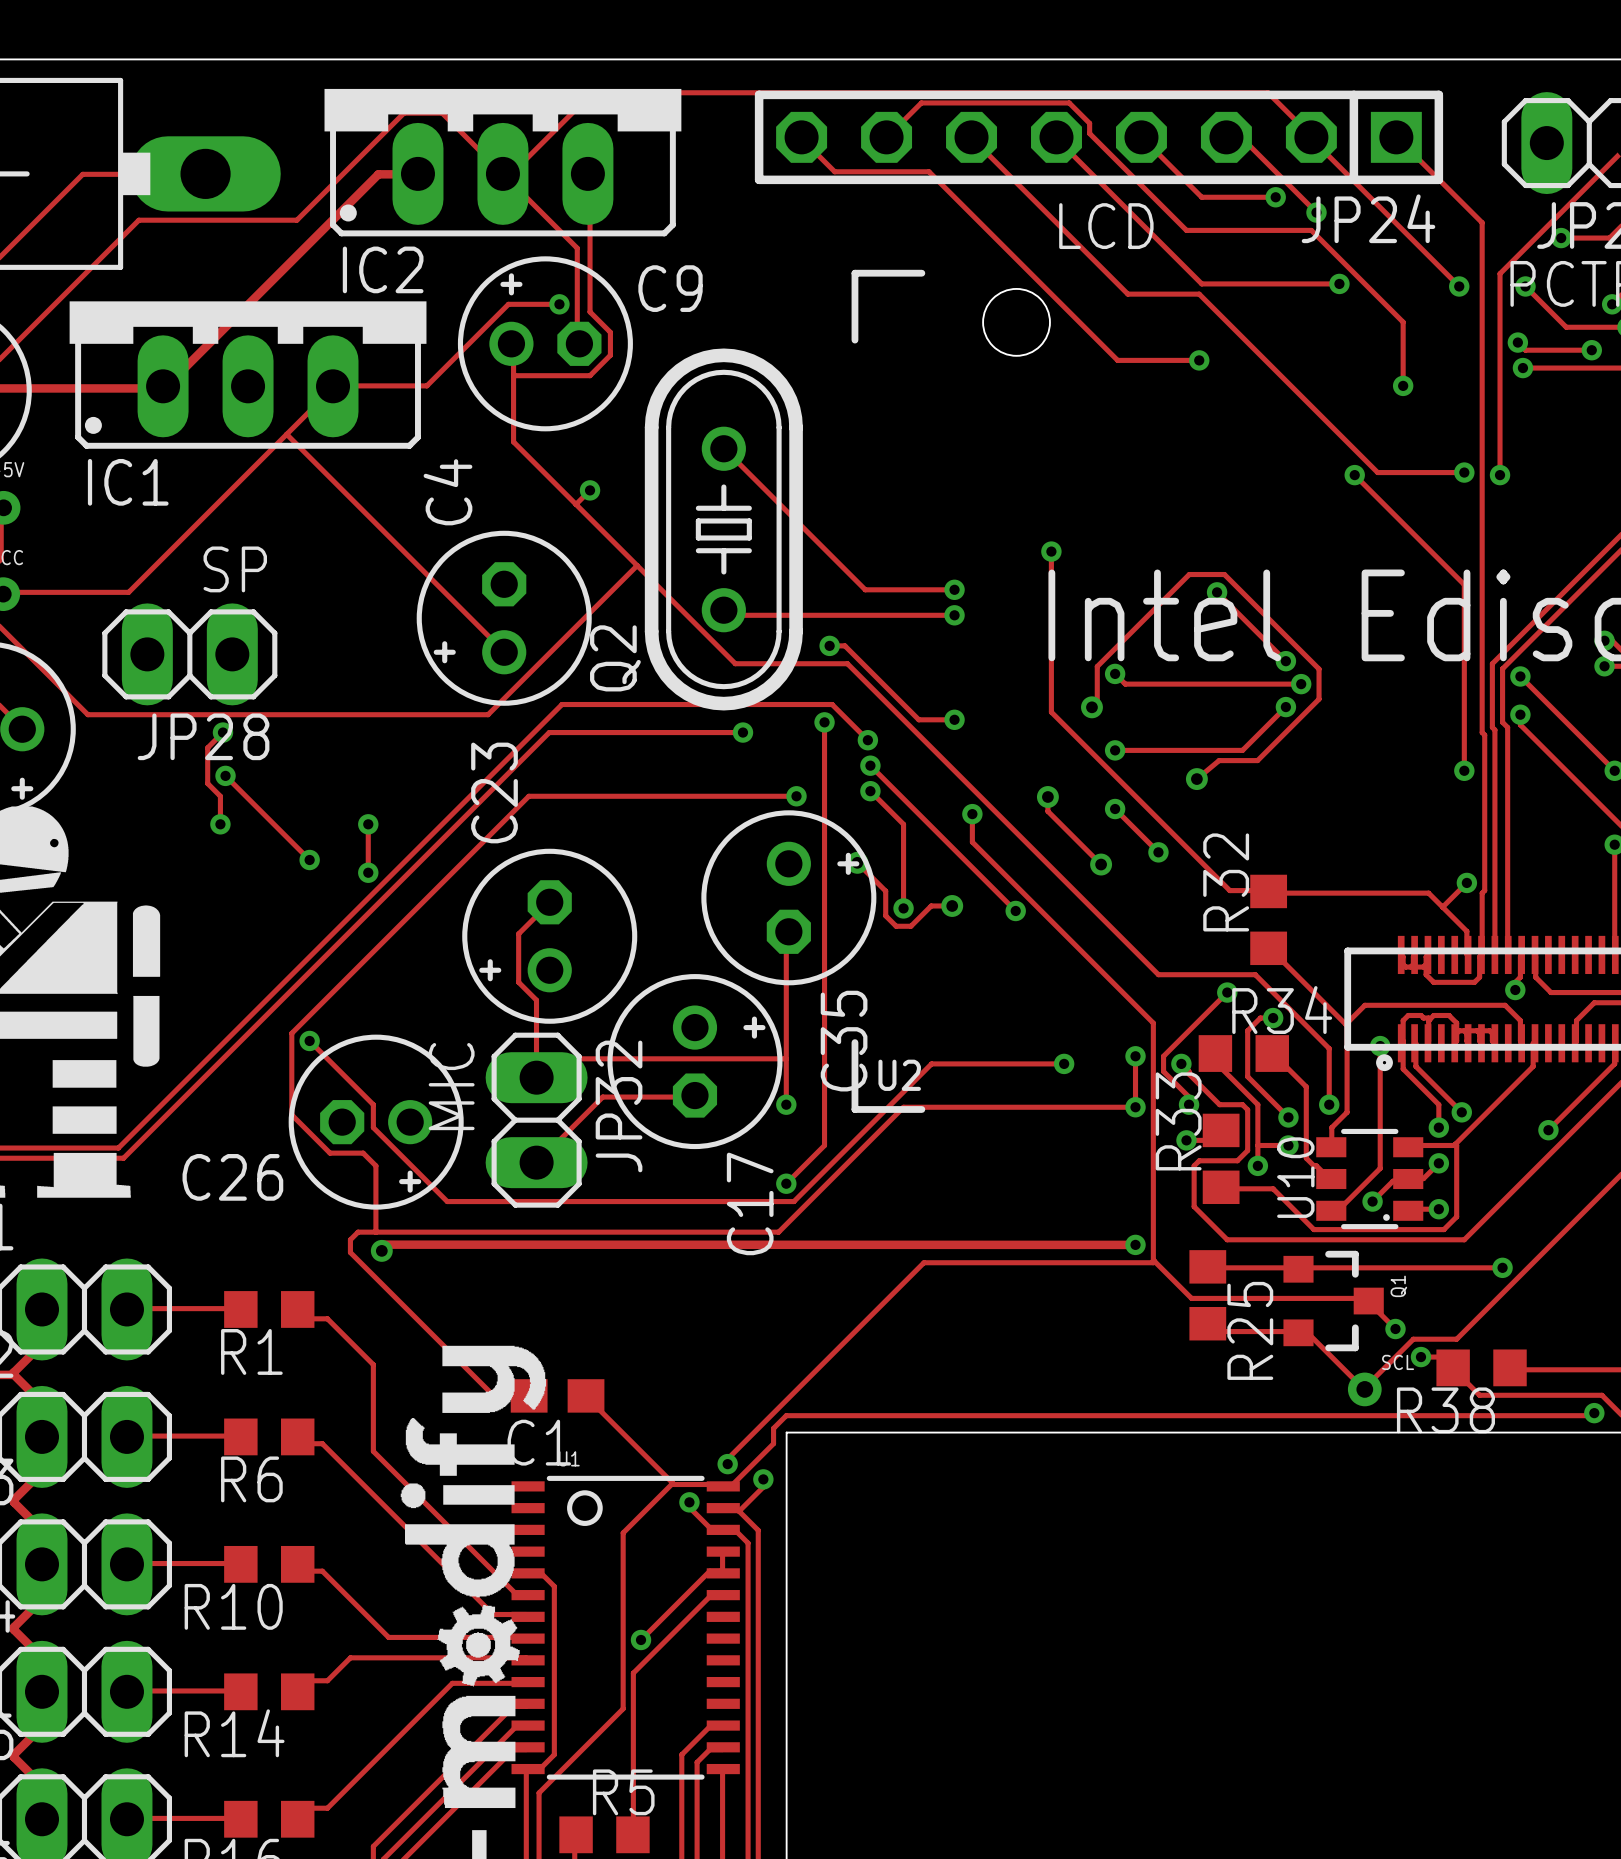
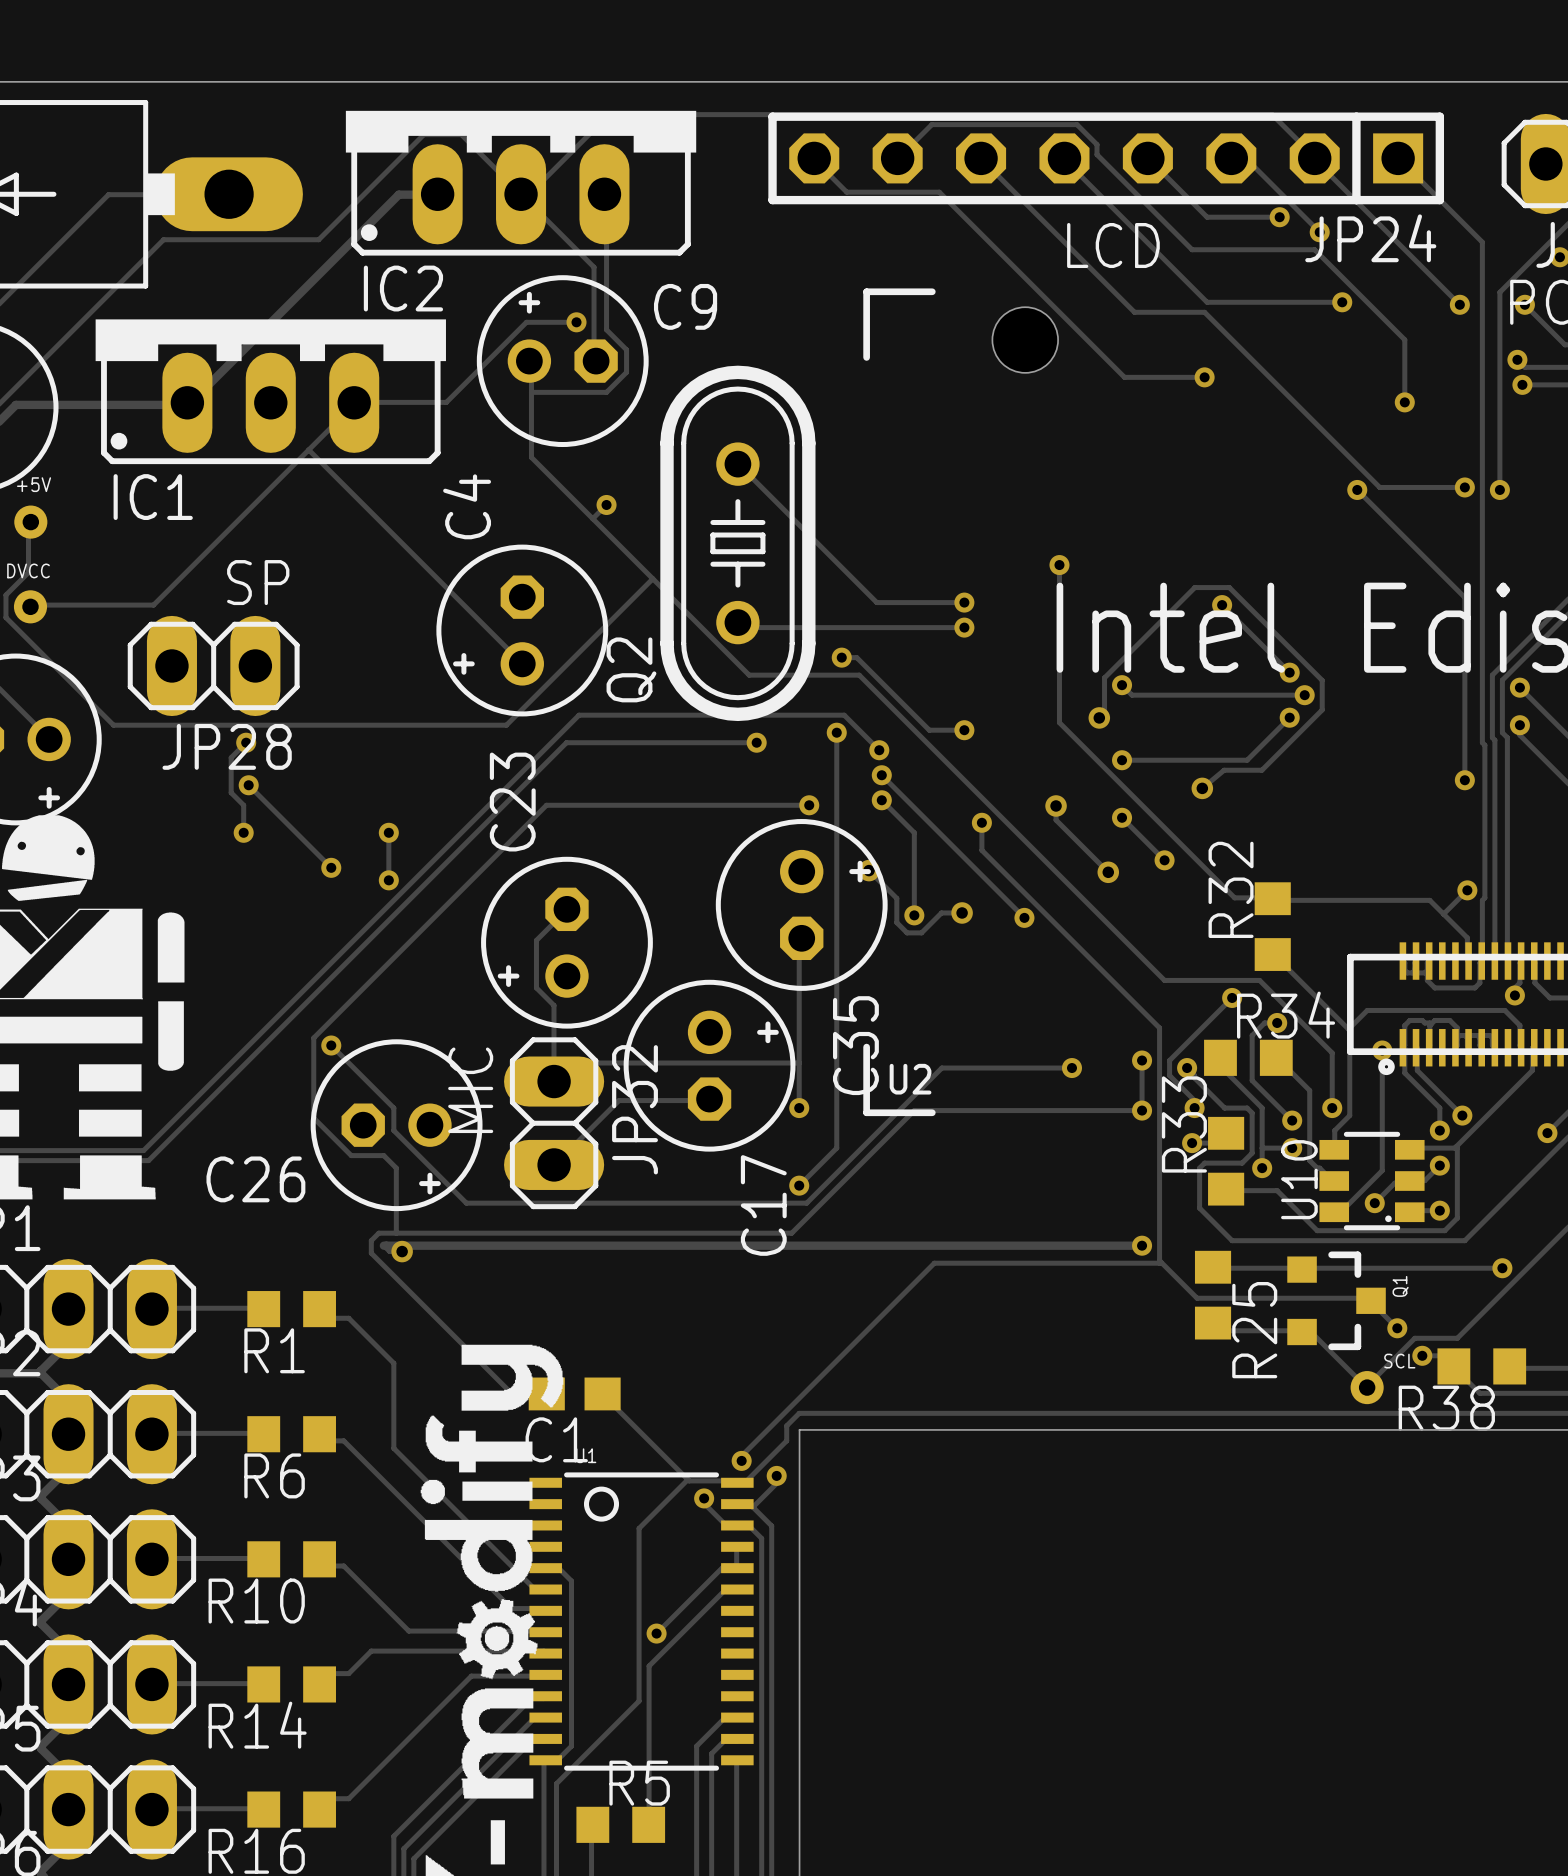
track: (382, 1244) (1135, 1244) -> (397, 1251) (389, 1251) (383, 1245) (1142, 1245)

